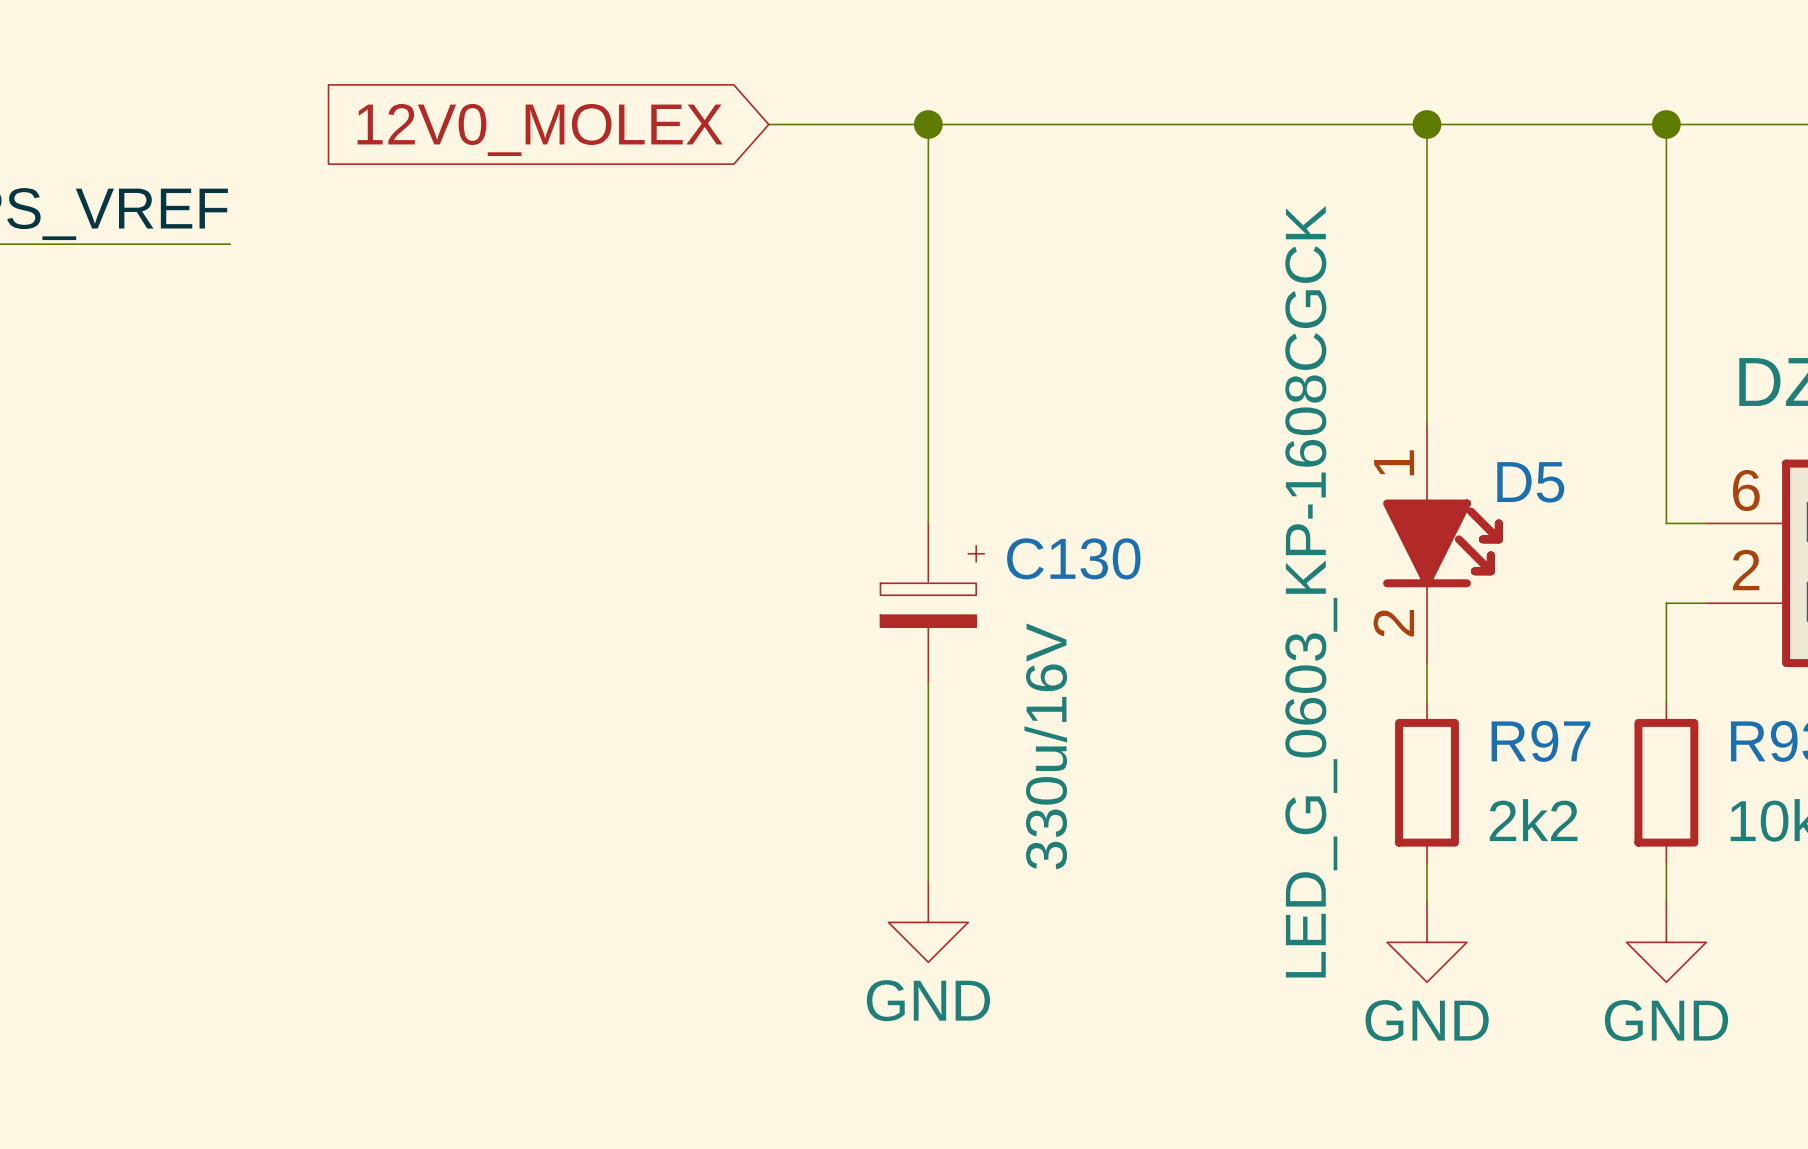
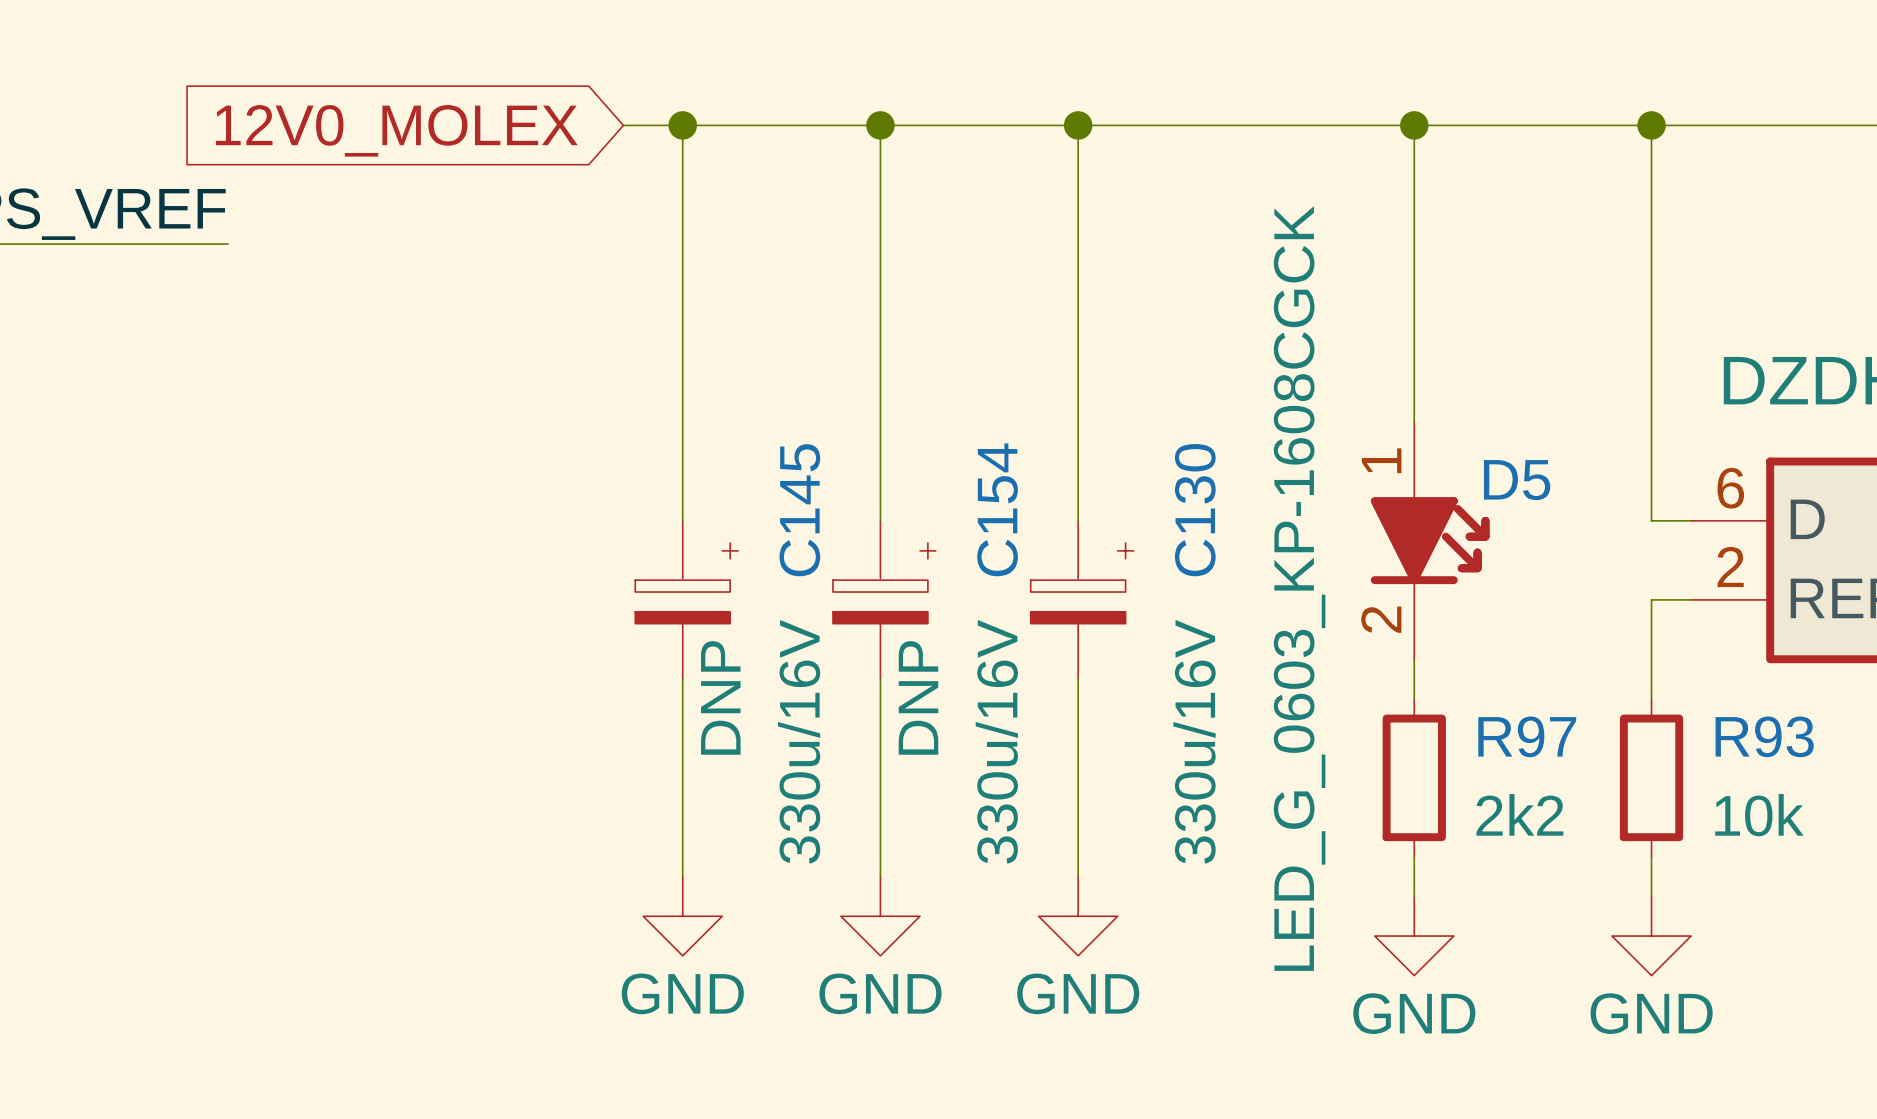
wire: none -> (623, 125) (761, 125)
wire: none -> (682, 125) (682, 520)
junction: none -> (682, 125)
wire: (928, 124) (928, 523) -> (880, 125) (880, 520)
junction position: (928, 124) -> (880, 125)
wire: none -> (1078, 125) (1078, 520)
junction: none -> (1078, 125)
global label position: 12V0_MOLEX (540, 129) -> 12V0_MOLEX (396, 130)
C130 name rotation: 0° (1073, 558) -> 90° counterclockwise (1195, 510)
C145: none -> (686, 599)
C154: none -> (884, 599)
C130 position: (932, 603) -> (1082, 599)
wire: none -> (682, 679) (682, 876)
wire: (928, 683) (928, 882) -> (880, 679) (880, 876)
wire: none -> (1078, 679) (1078, 876)
power symbol: none -> GND (682, 916)
power symbol position: GND (928, 922) -> GND (880, 916)
power symbol: none -> GND (1078, 916)

